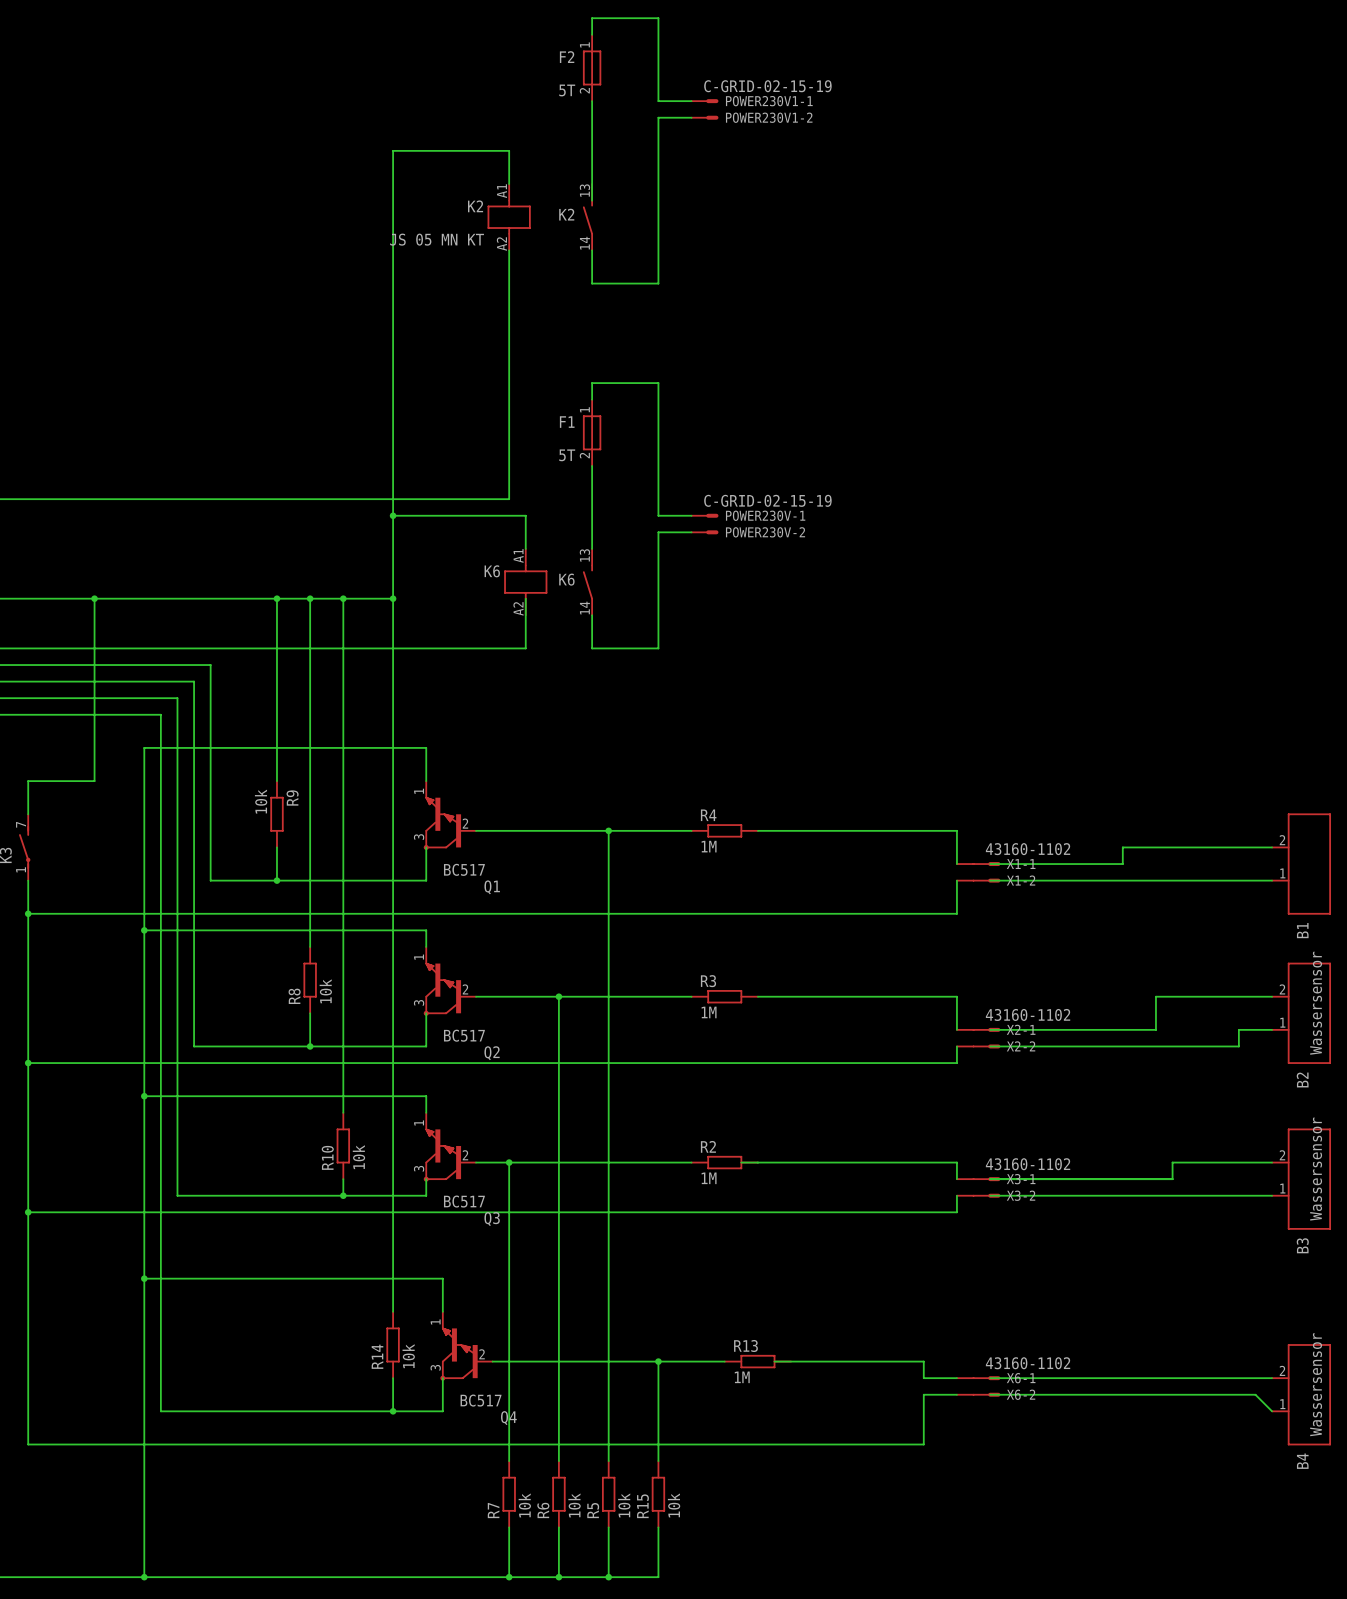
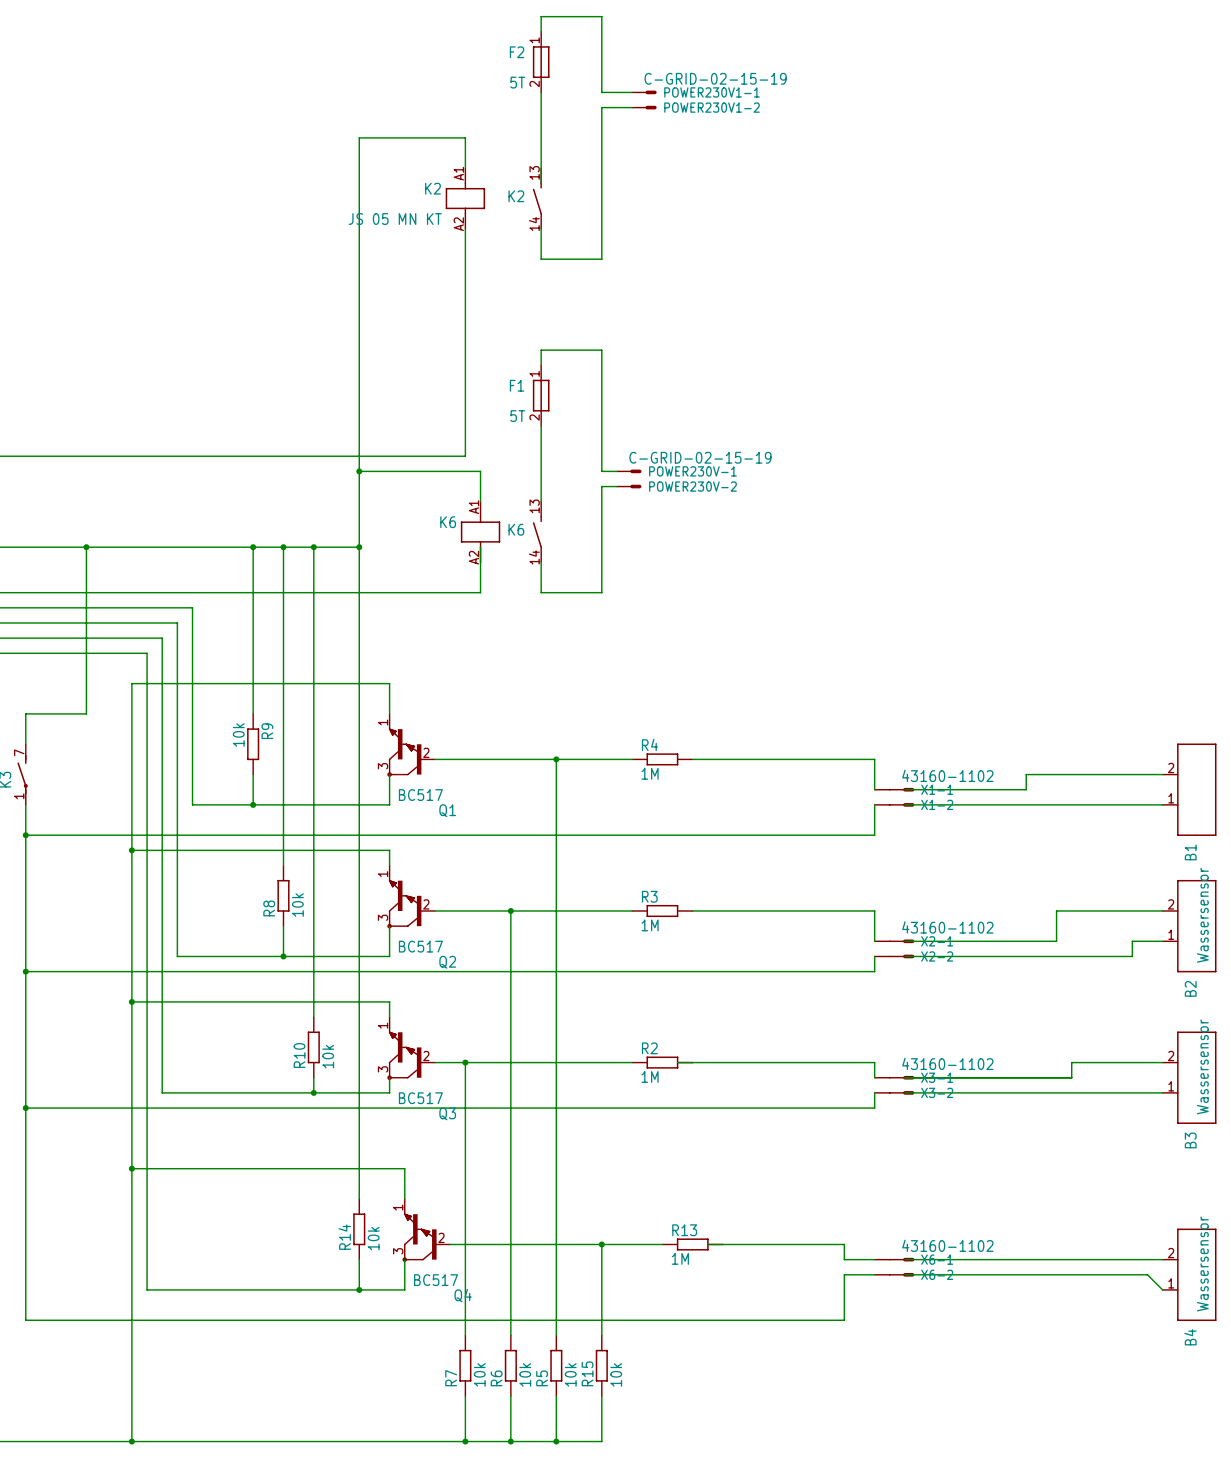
POWER230V-1 position: (705, 515) -> (629, 471)
POWER230V-2 position: (705, 532) -> (629, 486)

